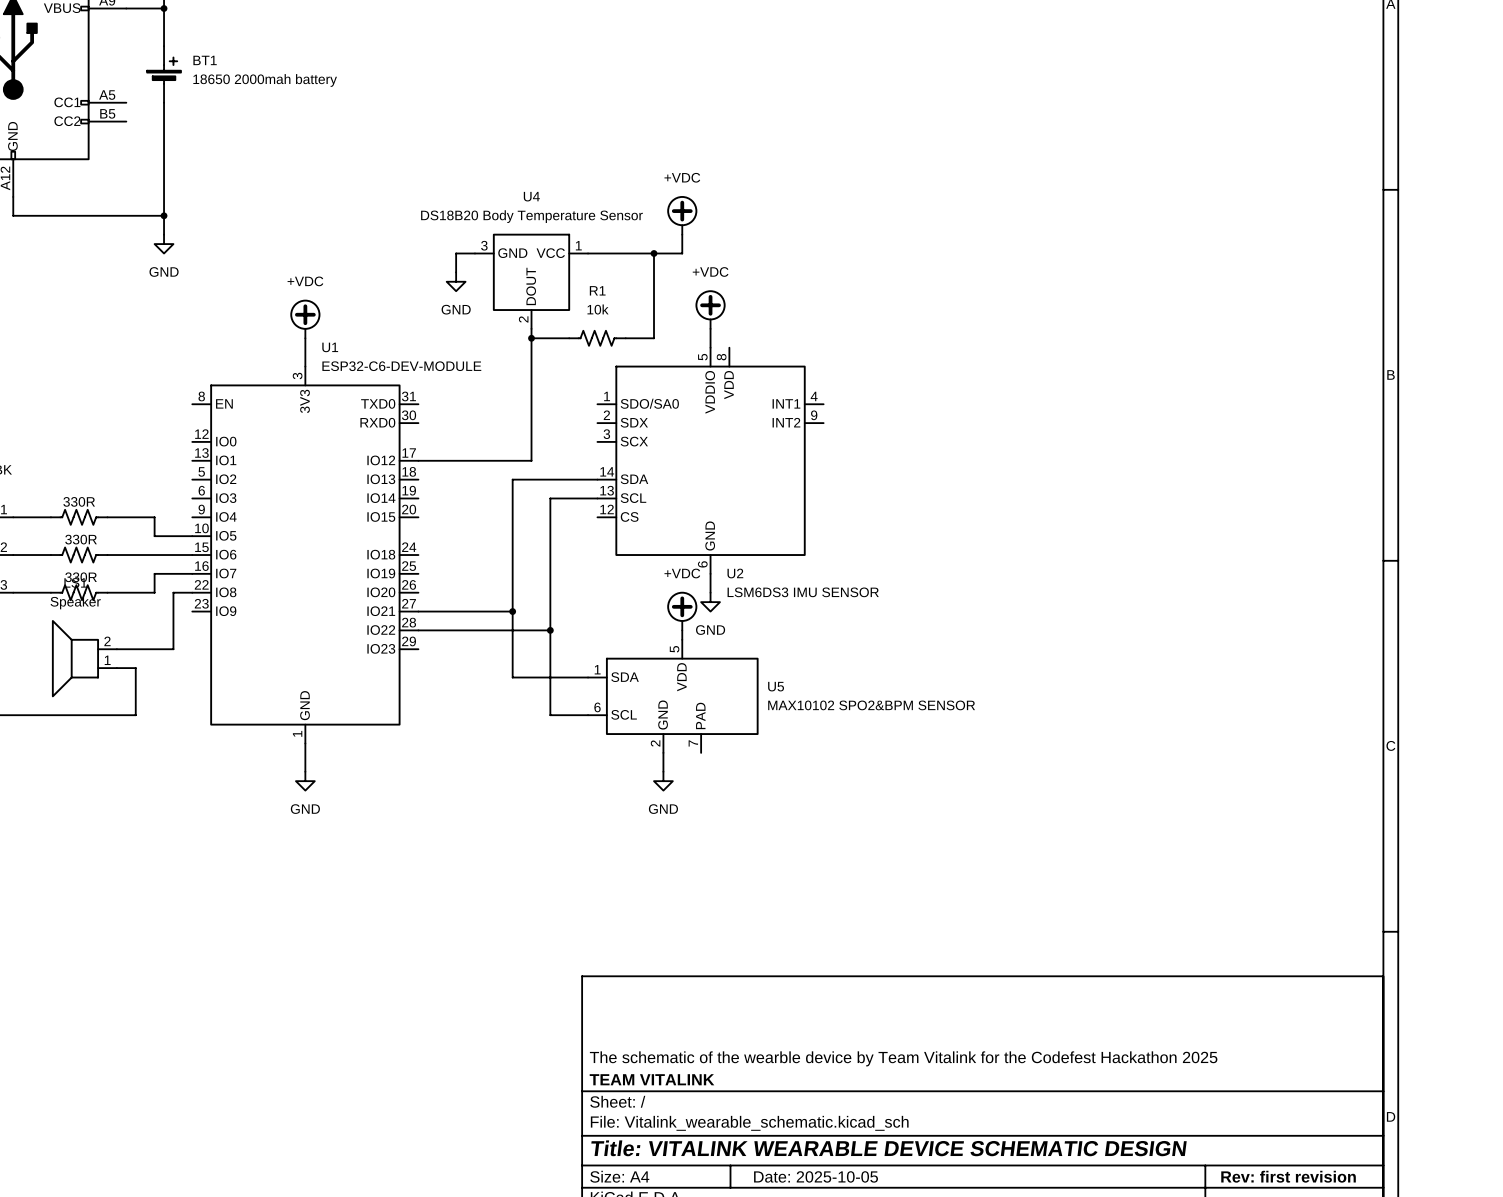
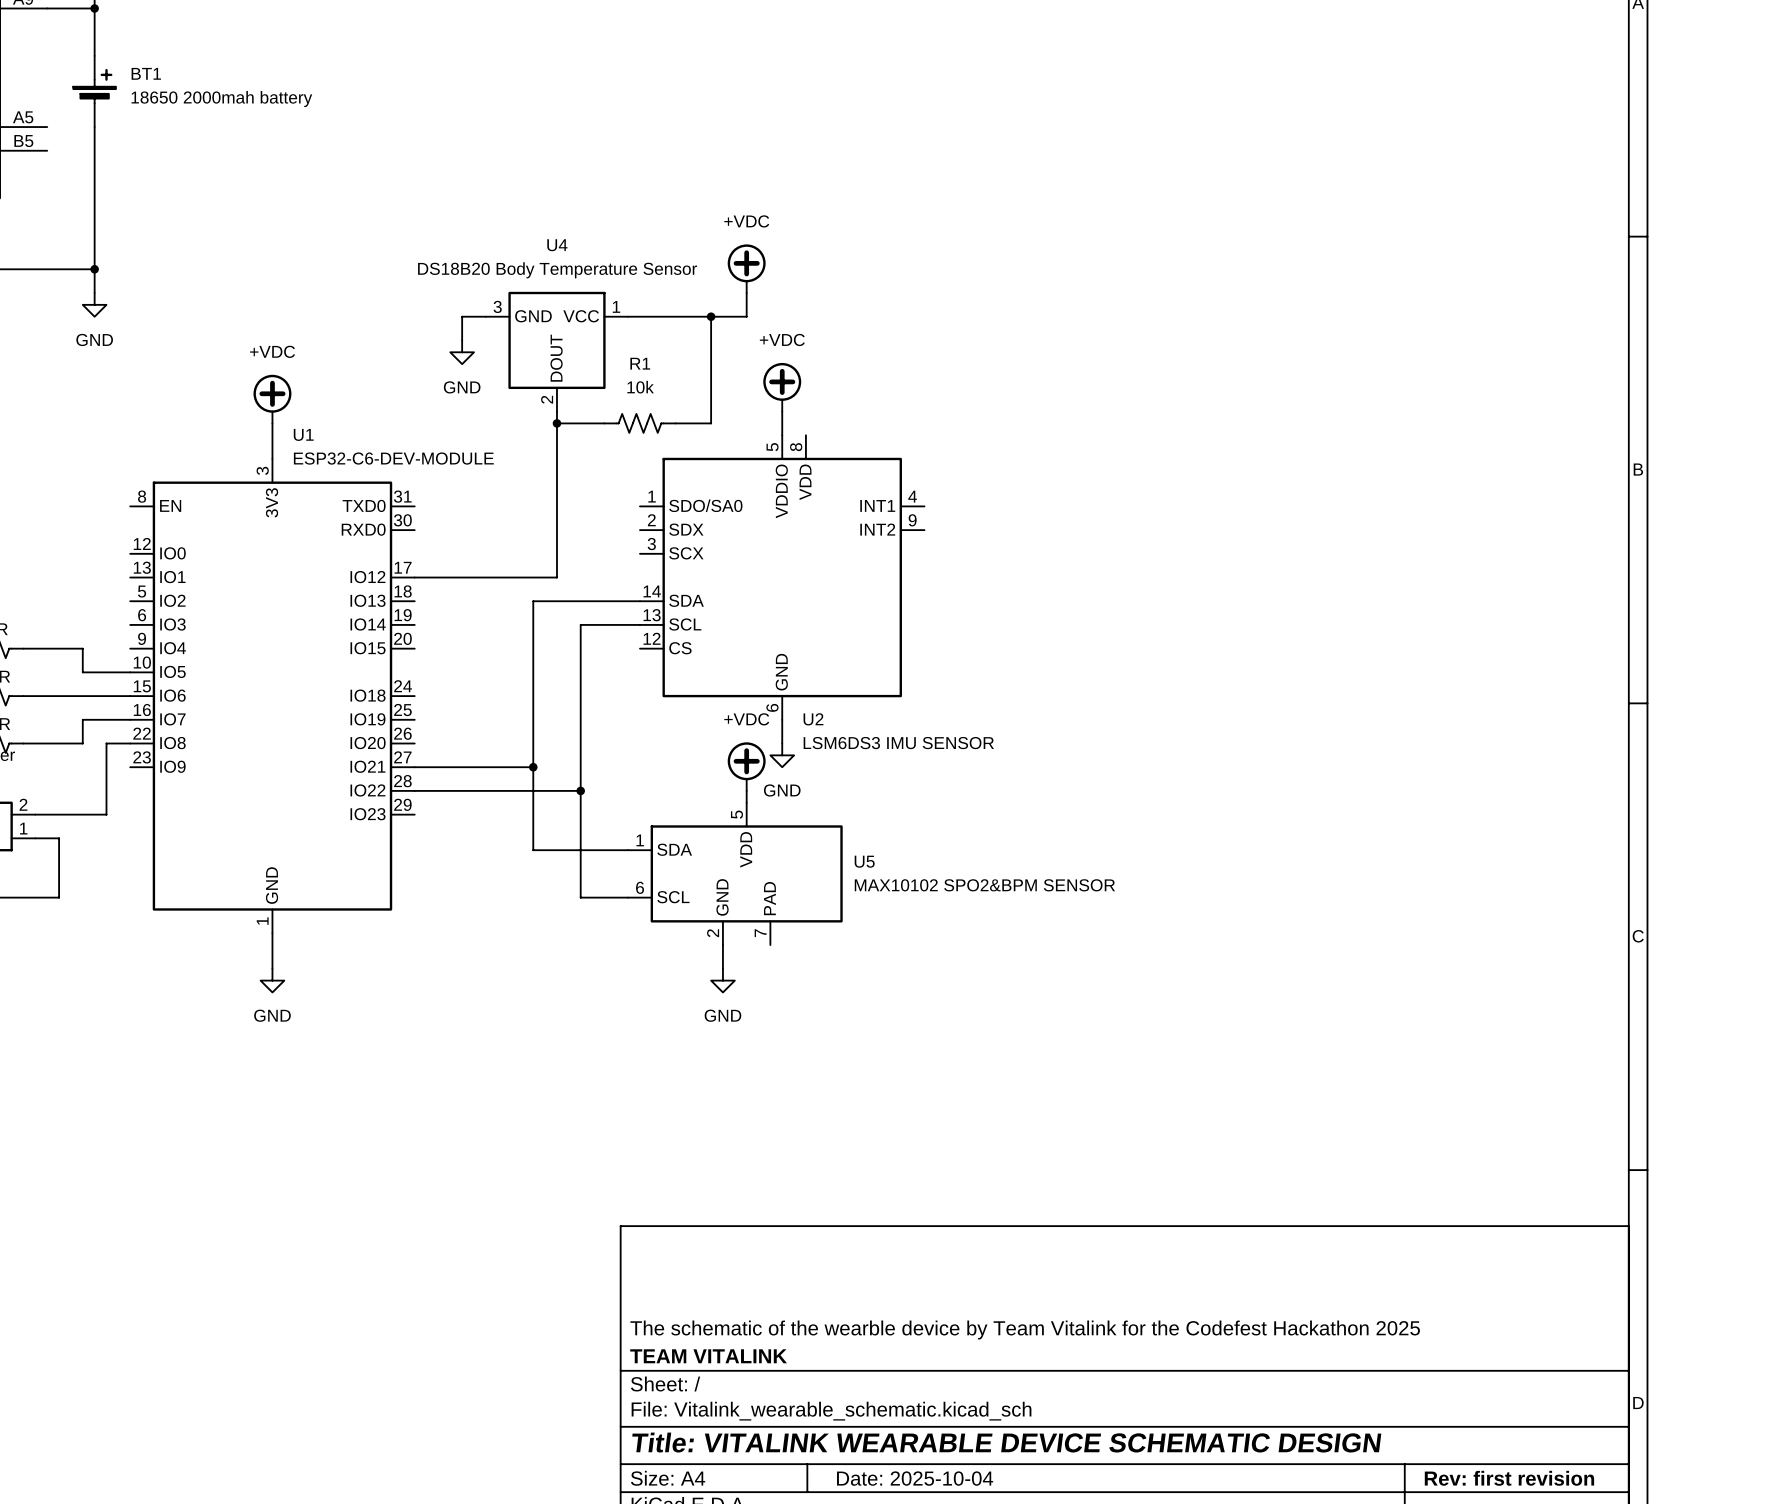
title block: Date: 2025-10-05 (816, 1176) -> Date: 2025-10-04 (915, 1478)

